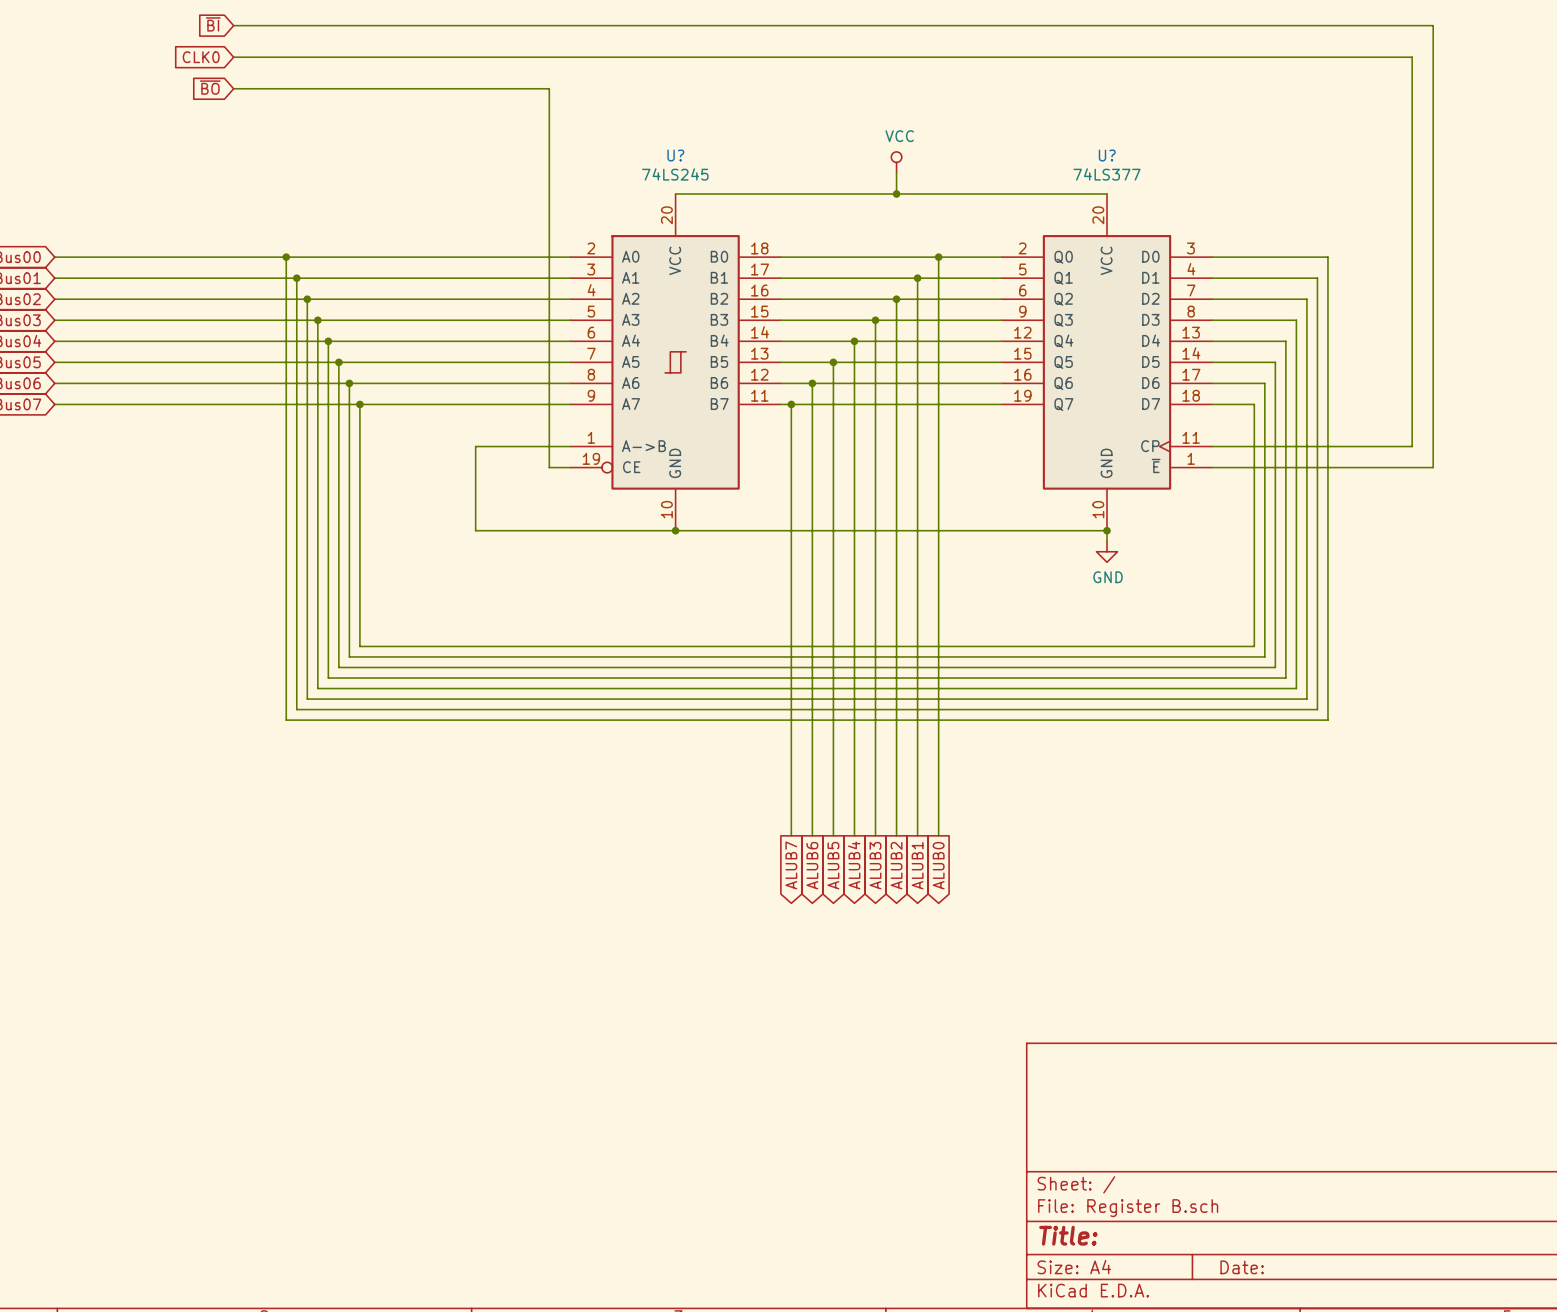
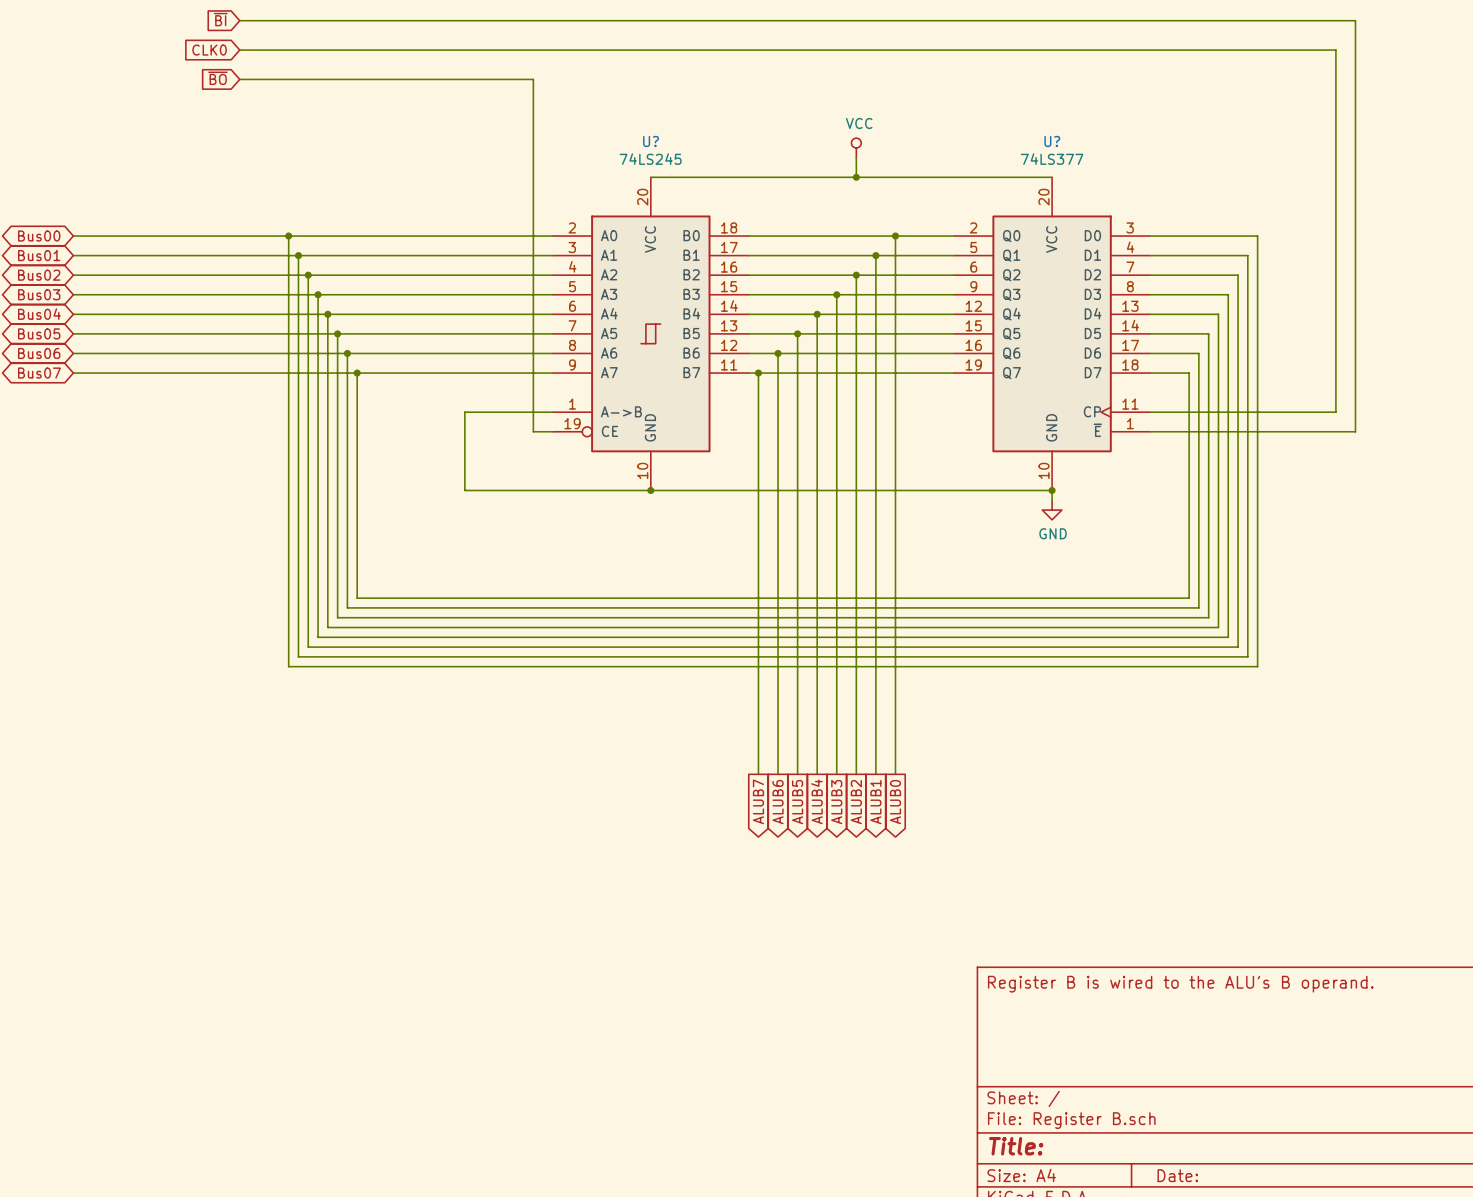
title block: none -> Register B is wired to the ALU's B operand. (1180, 984)

